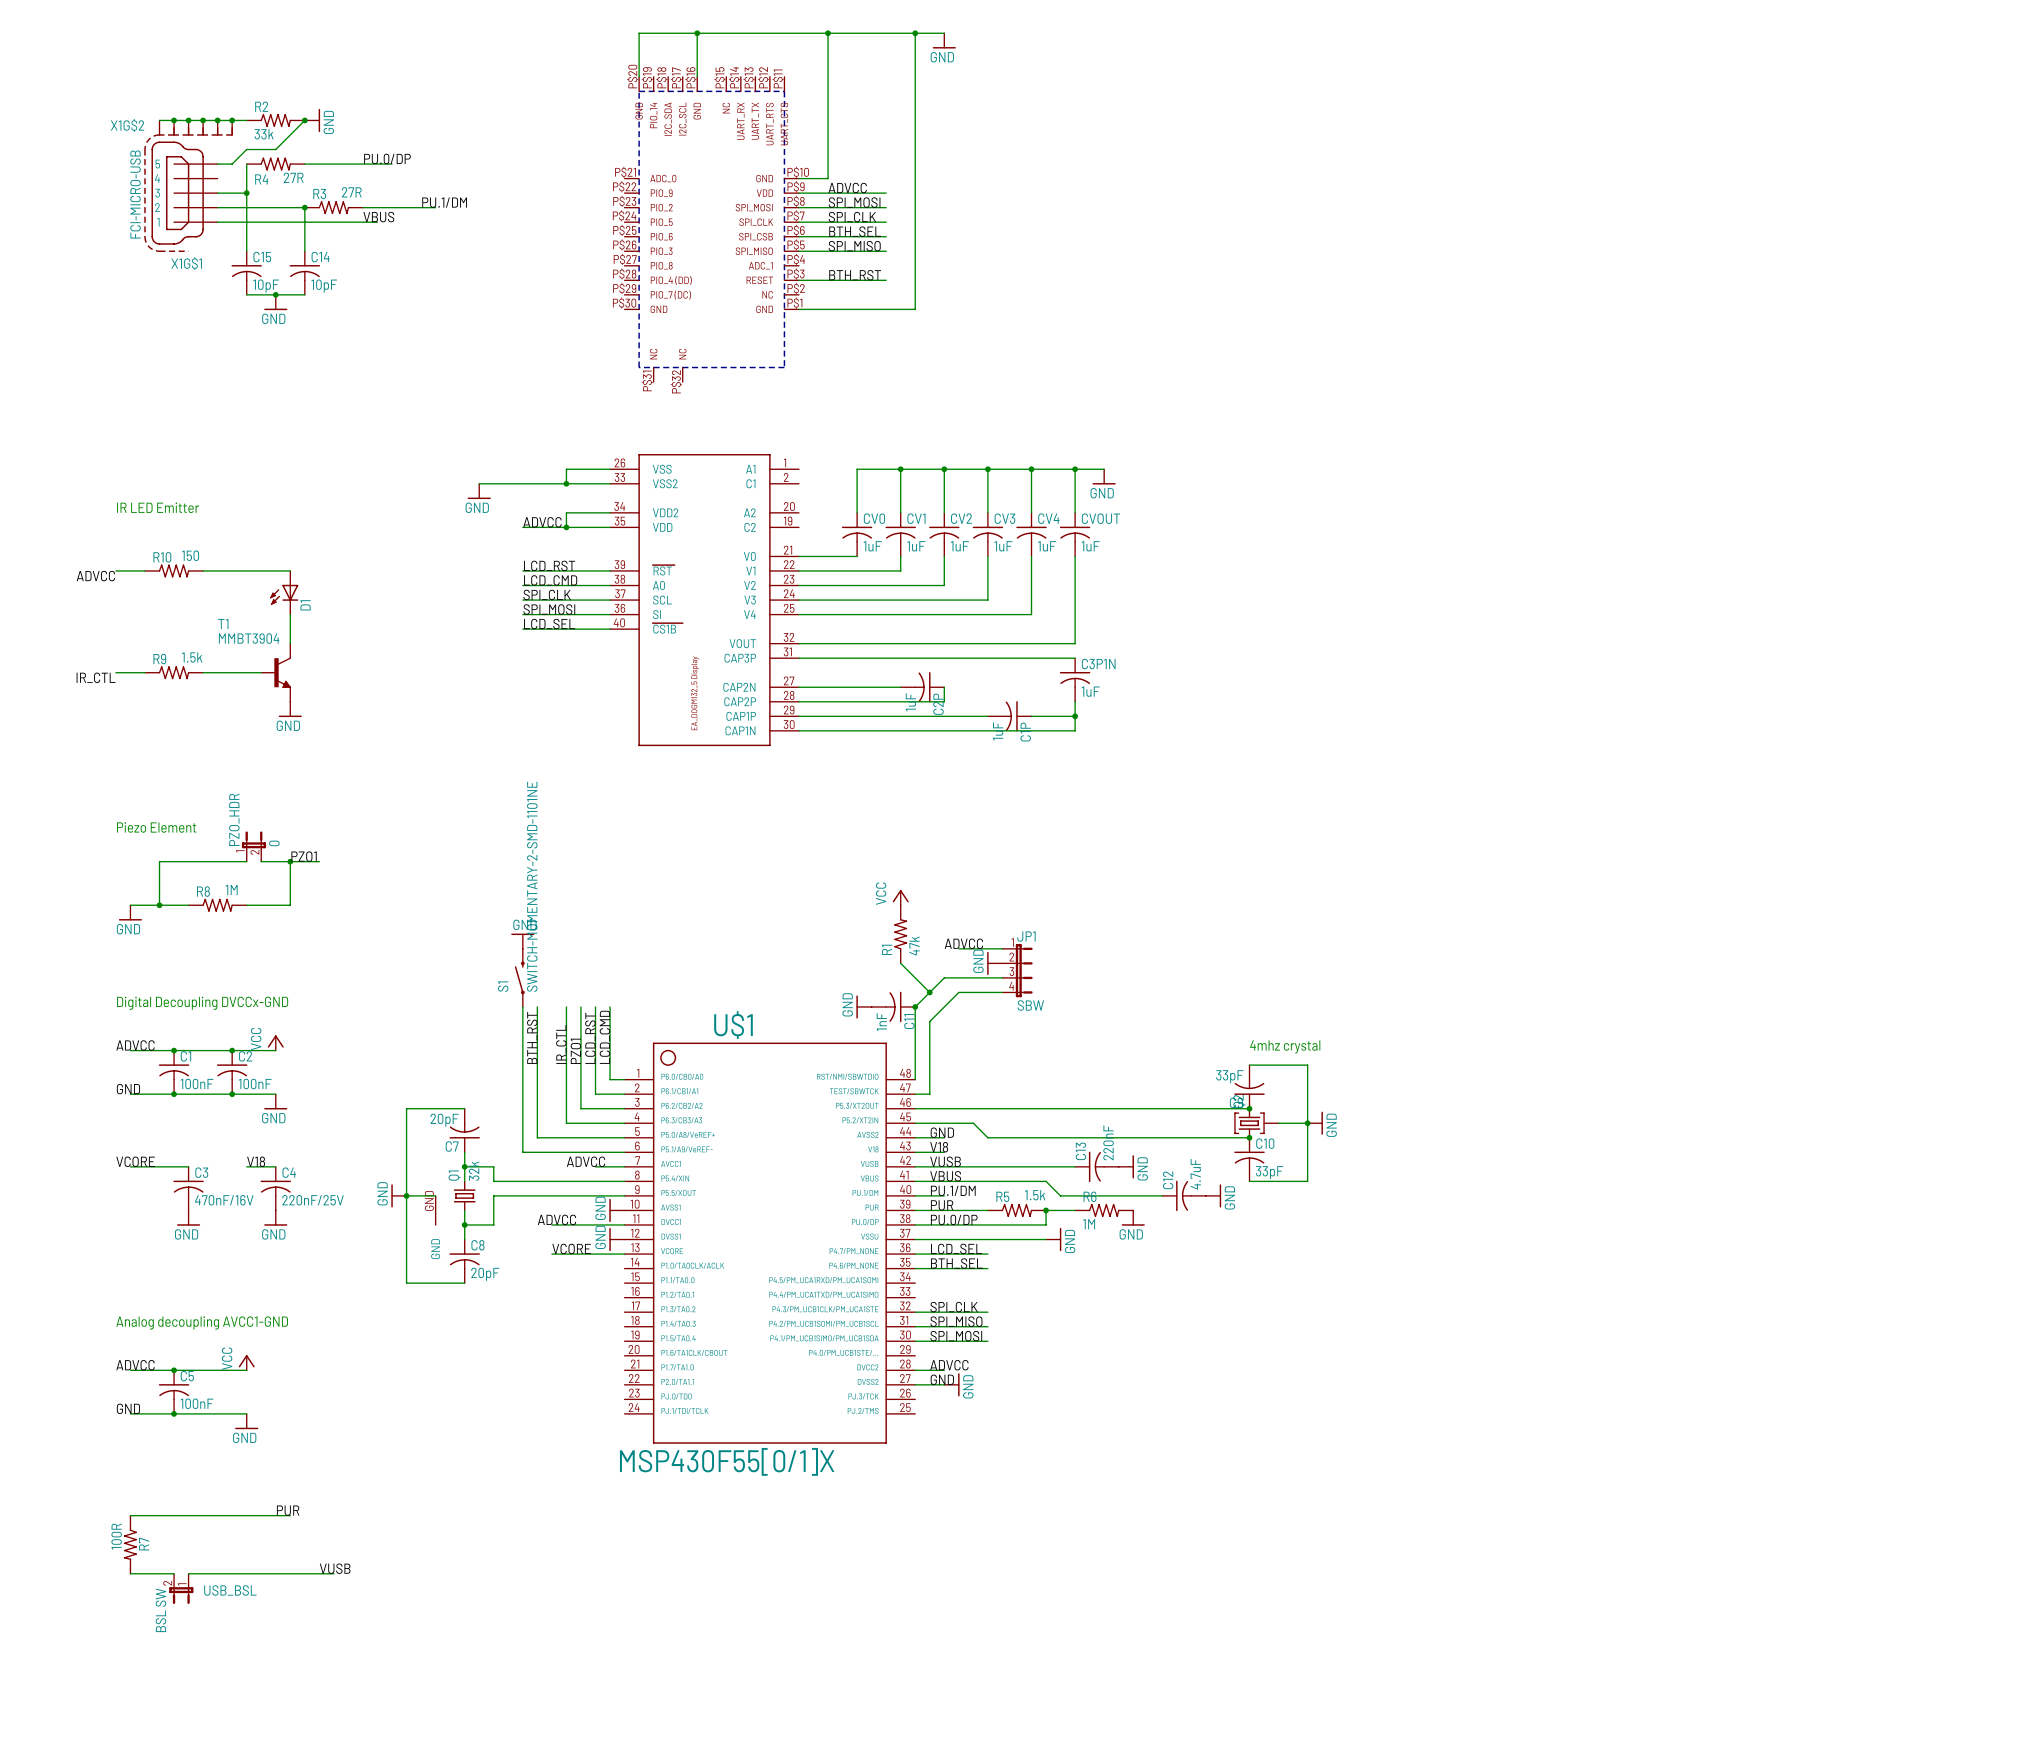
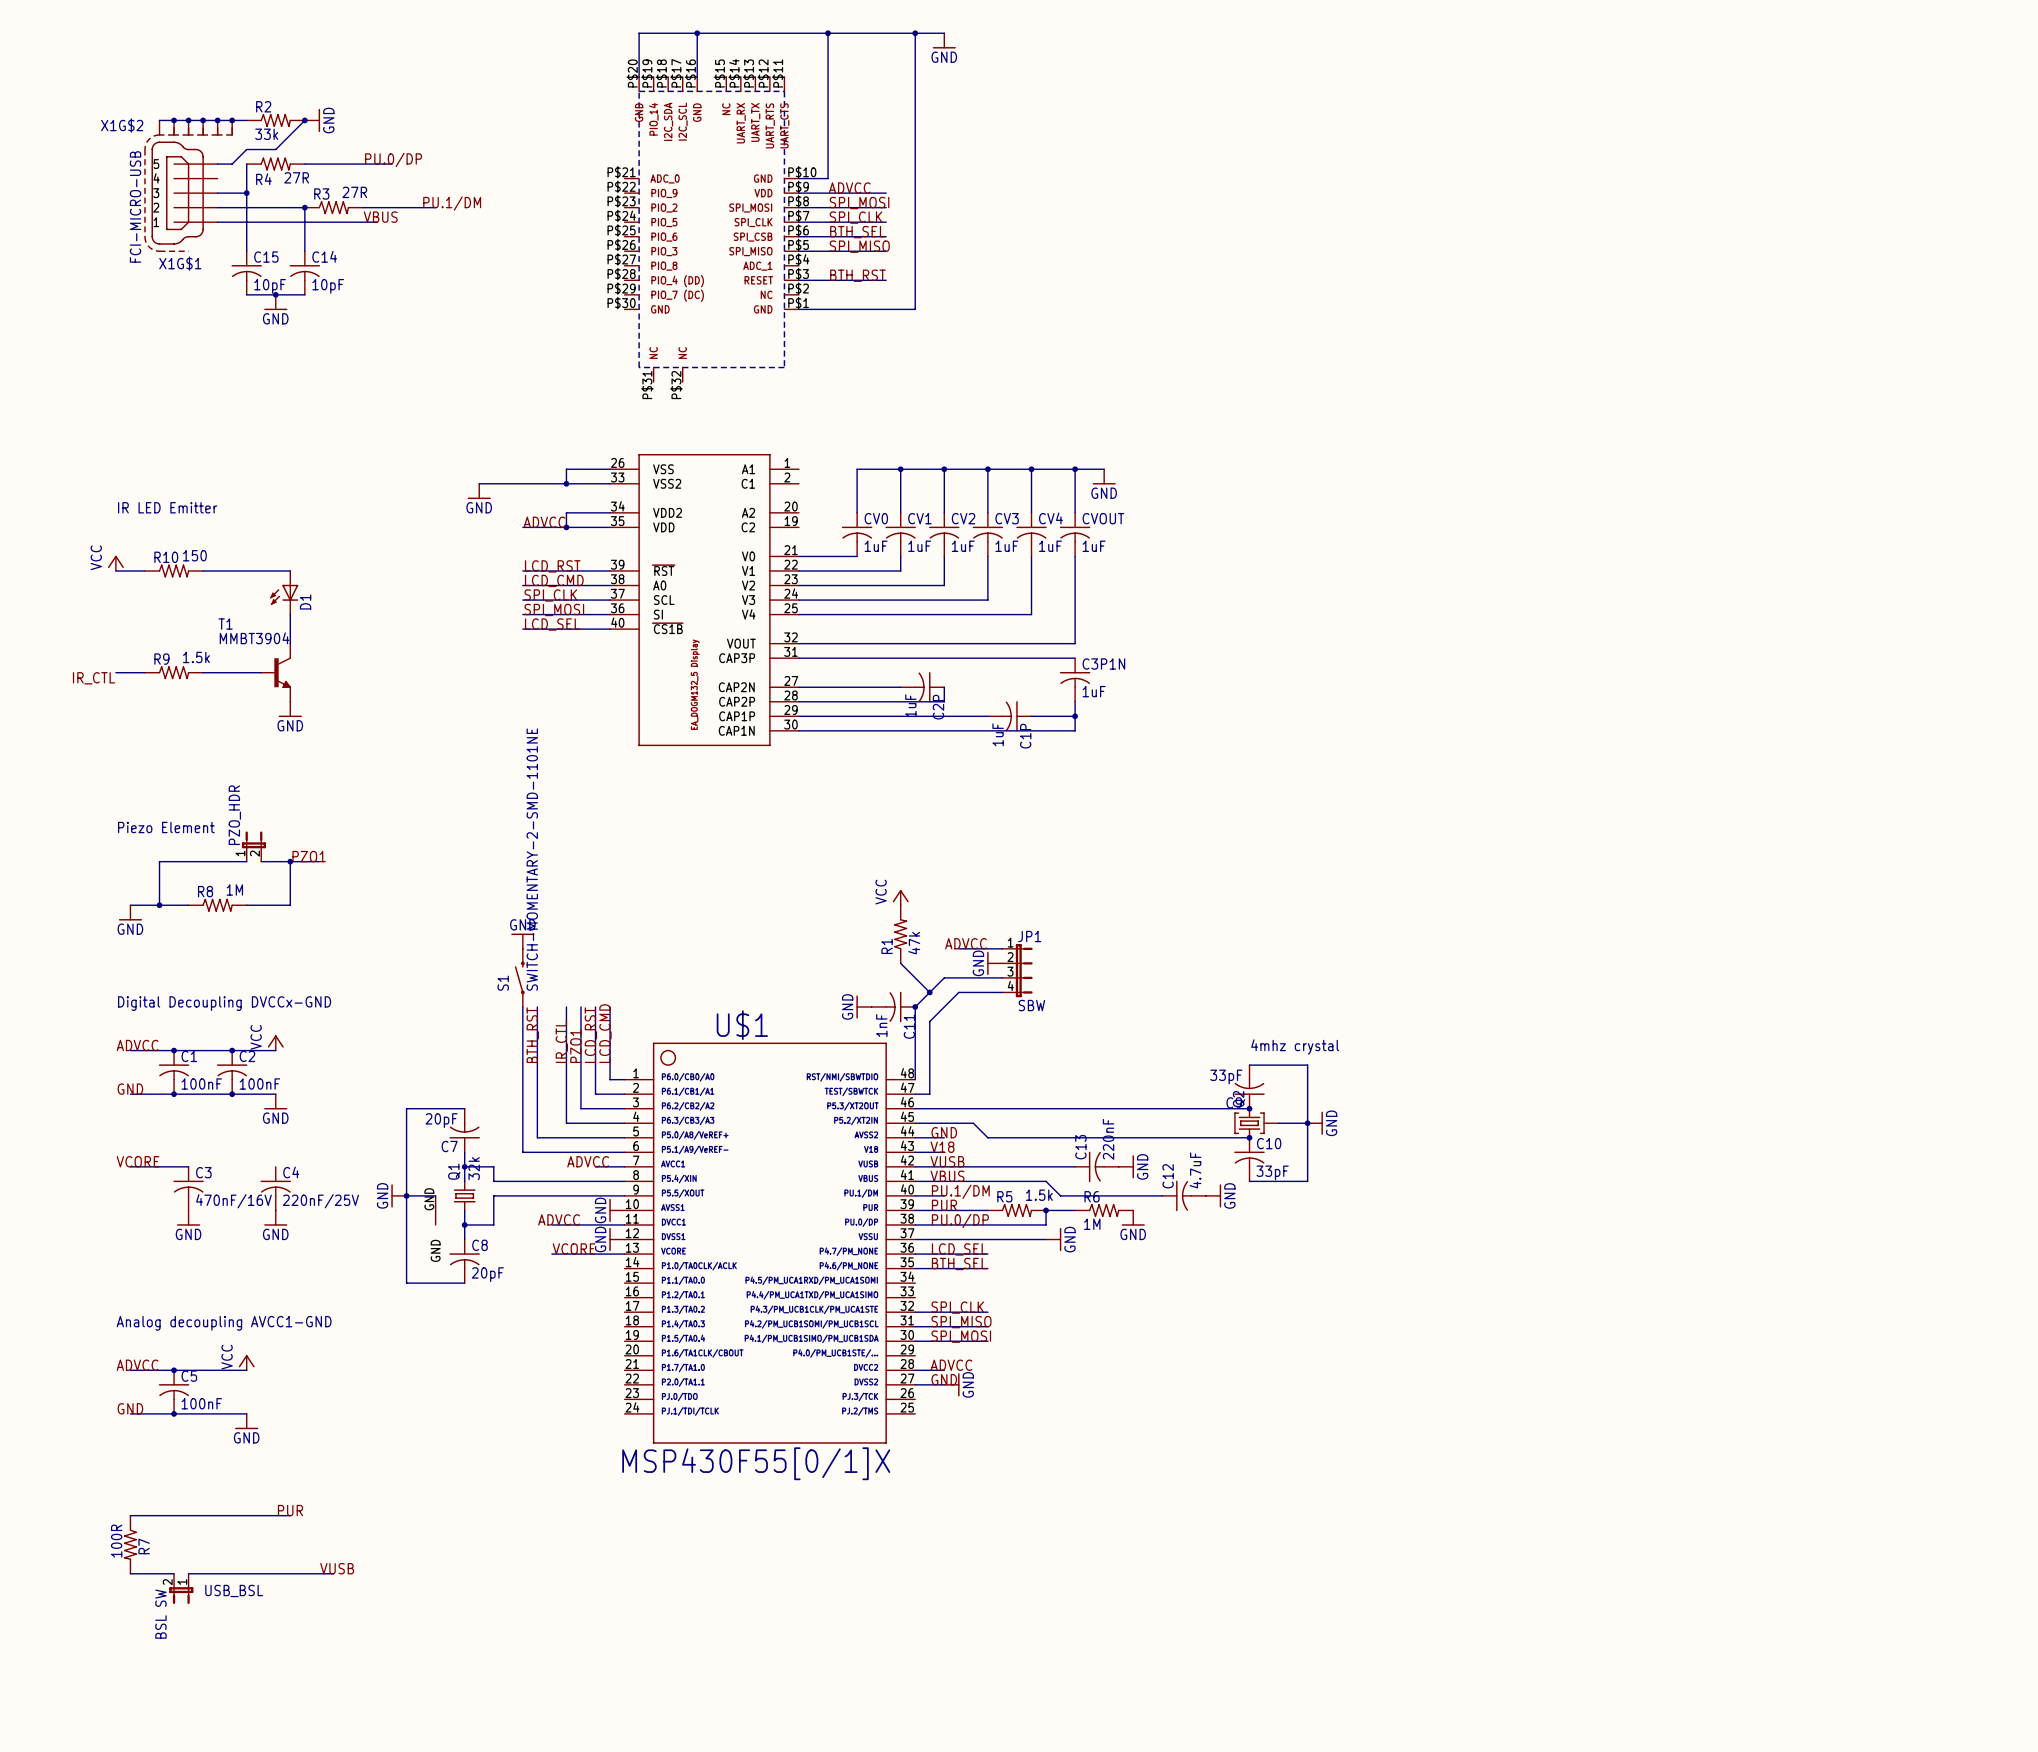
power symbol: none -> VCC (115, 563)
label: ADVCC (95, 576) -> none
PZO_HDR value: 0 (274, 843) -> none
label: V18 (256, 1161) -> none
wire: (246, 1166) (275, 1166) -> none

